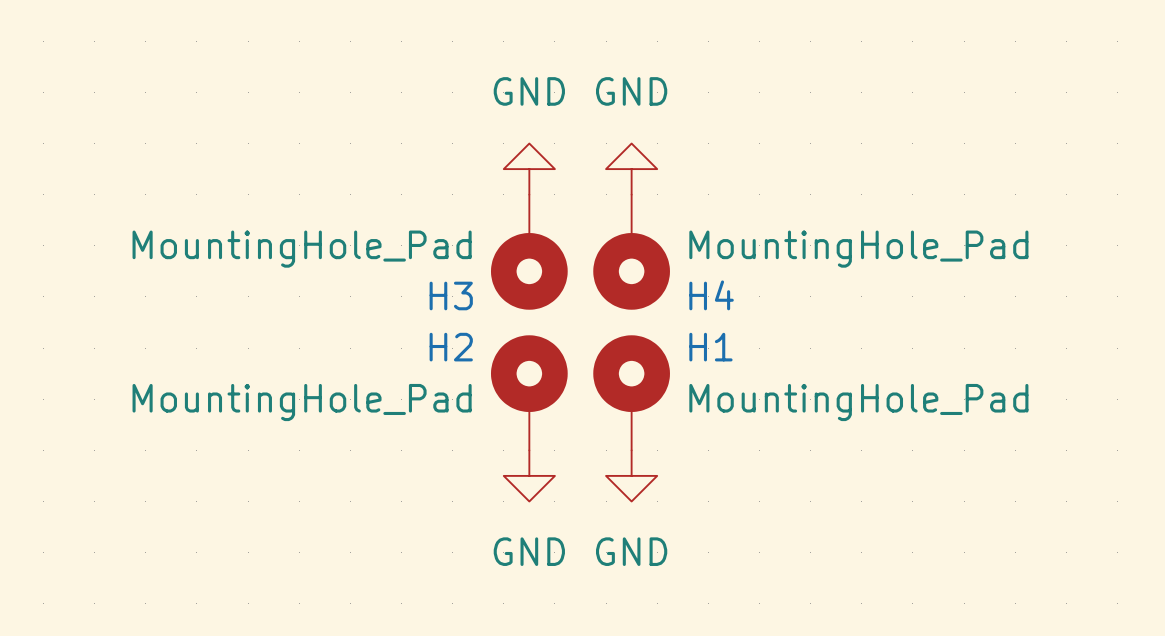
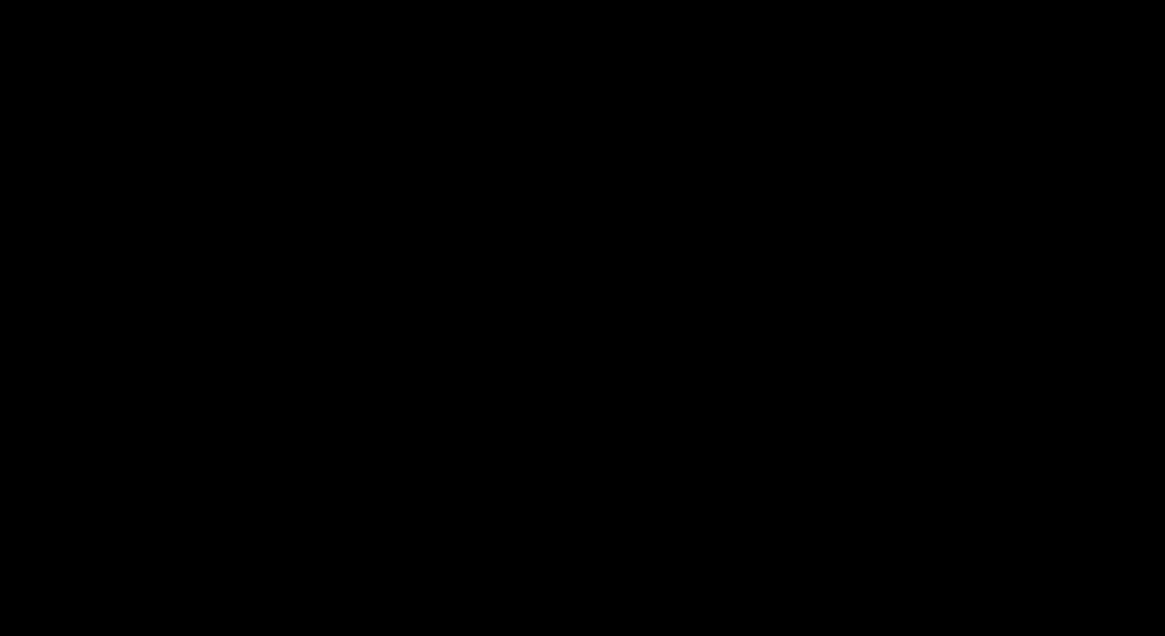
power symbol: GND (529, 169) -> none
power symbol: GND (631, 169) -> none
H3: MountingHole_Pad (529, 252) -> none
H4: MountingHole_Pad (631, 252) -> none
H2: MountingHole_Pad (529, 392) -> none
H1: MountingHole_Pad (631, 392) -> none
power symbol: GND (529, 475) -> none
power symbol: GND (631, 475) -> none

